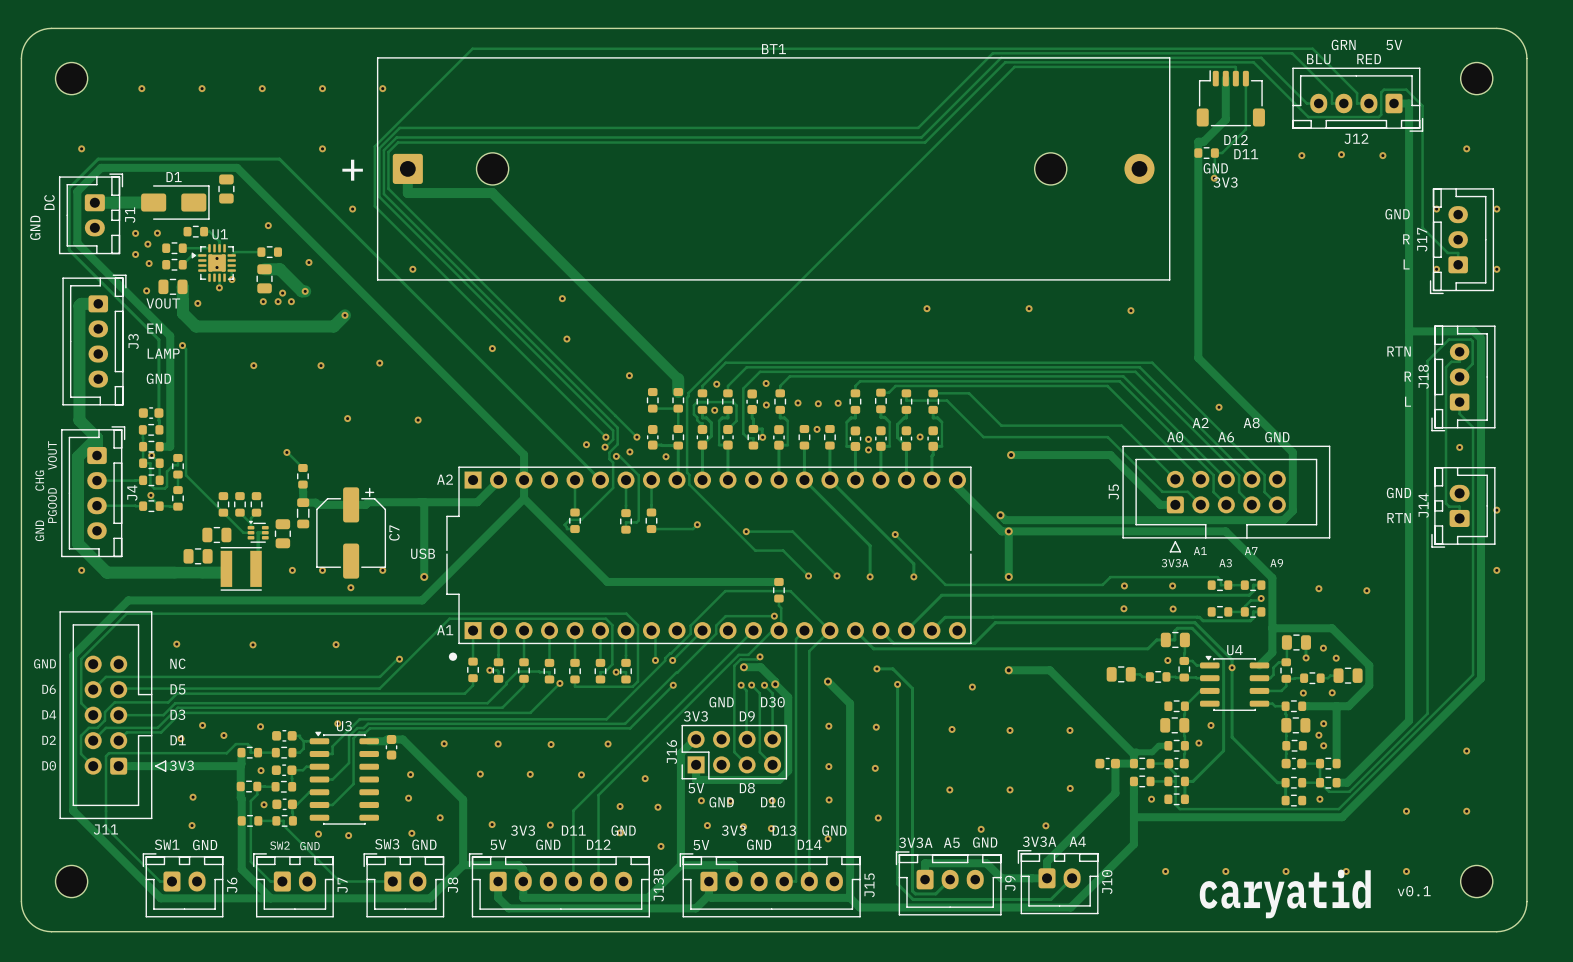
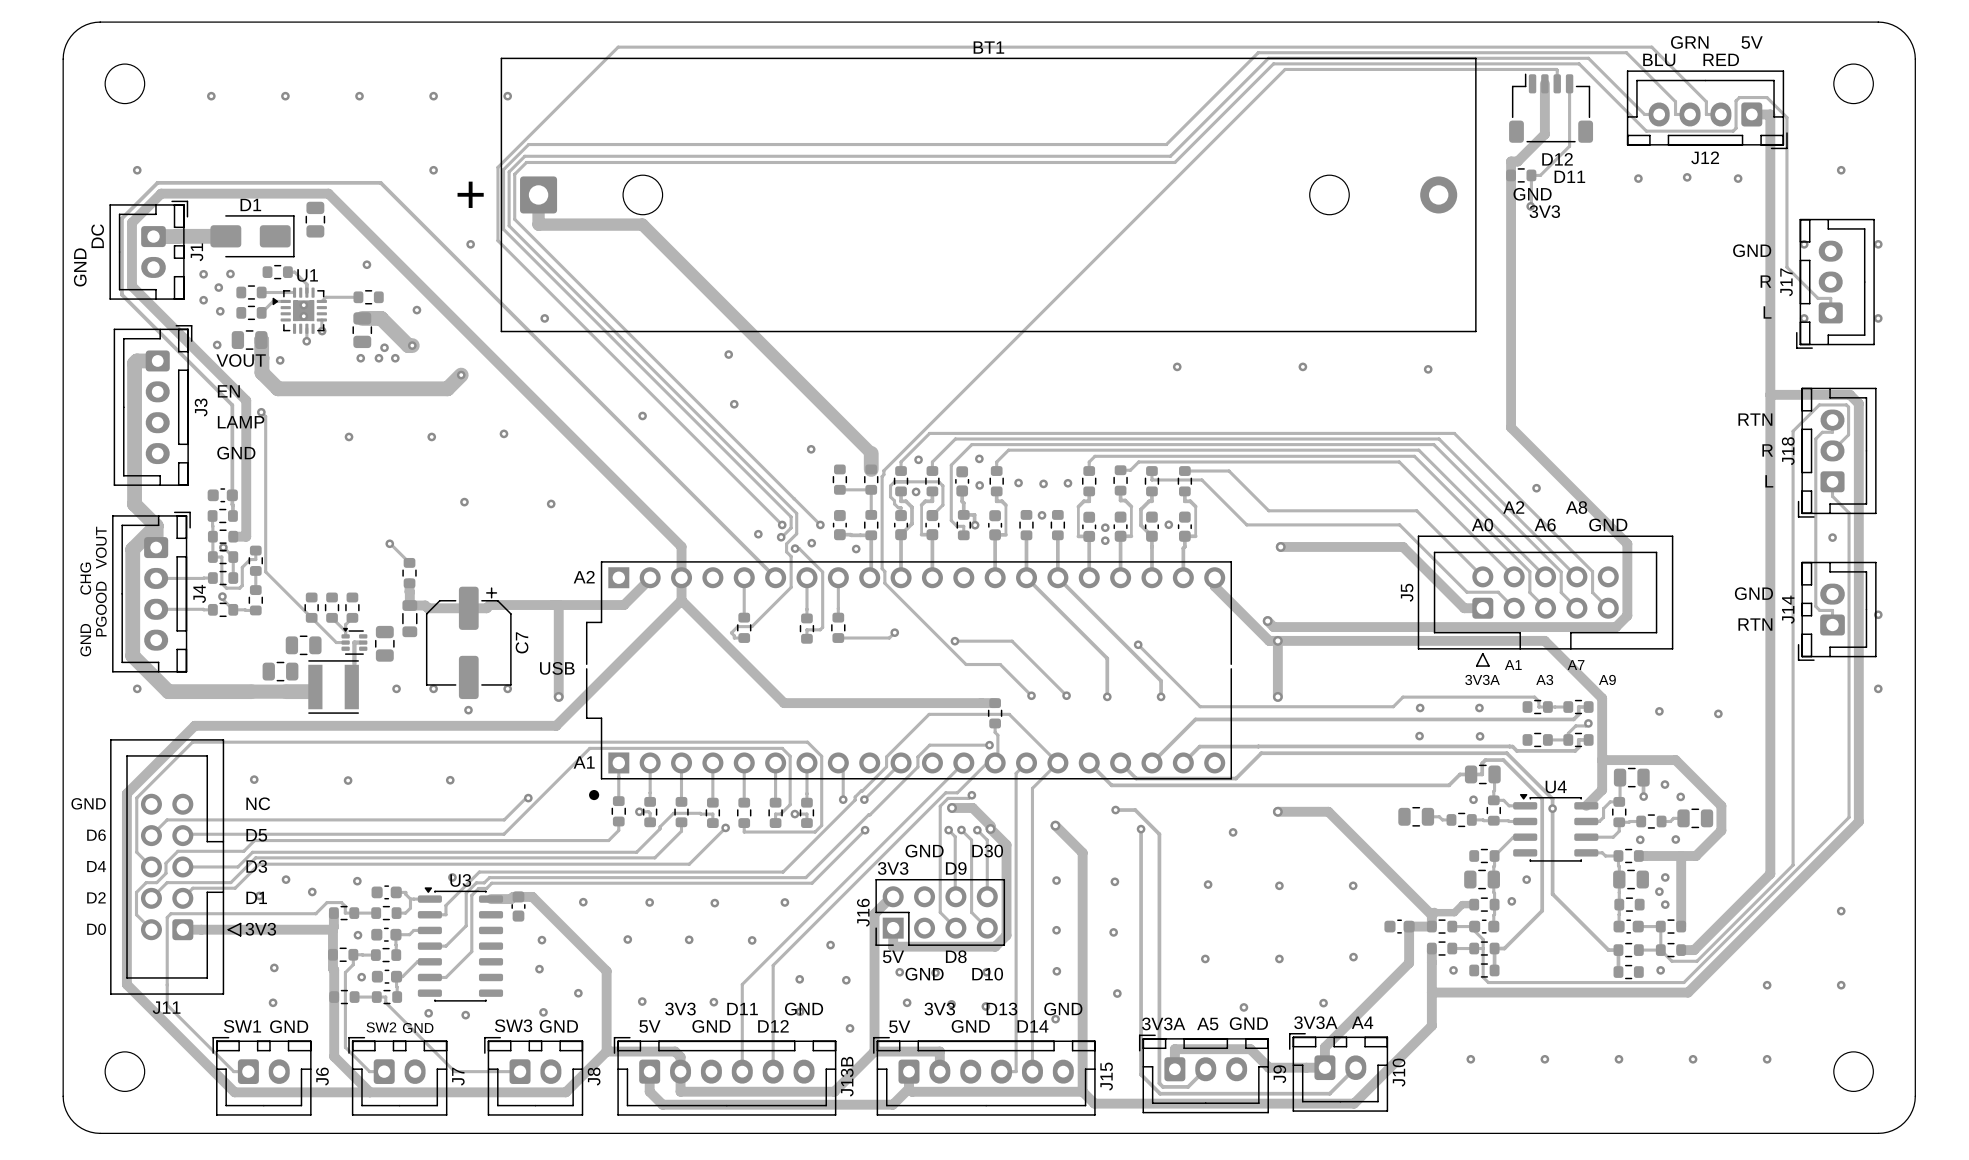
text: v0.1 (1414, 891) -> none
text: caryatid (1285, 893) -> none

